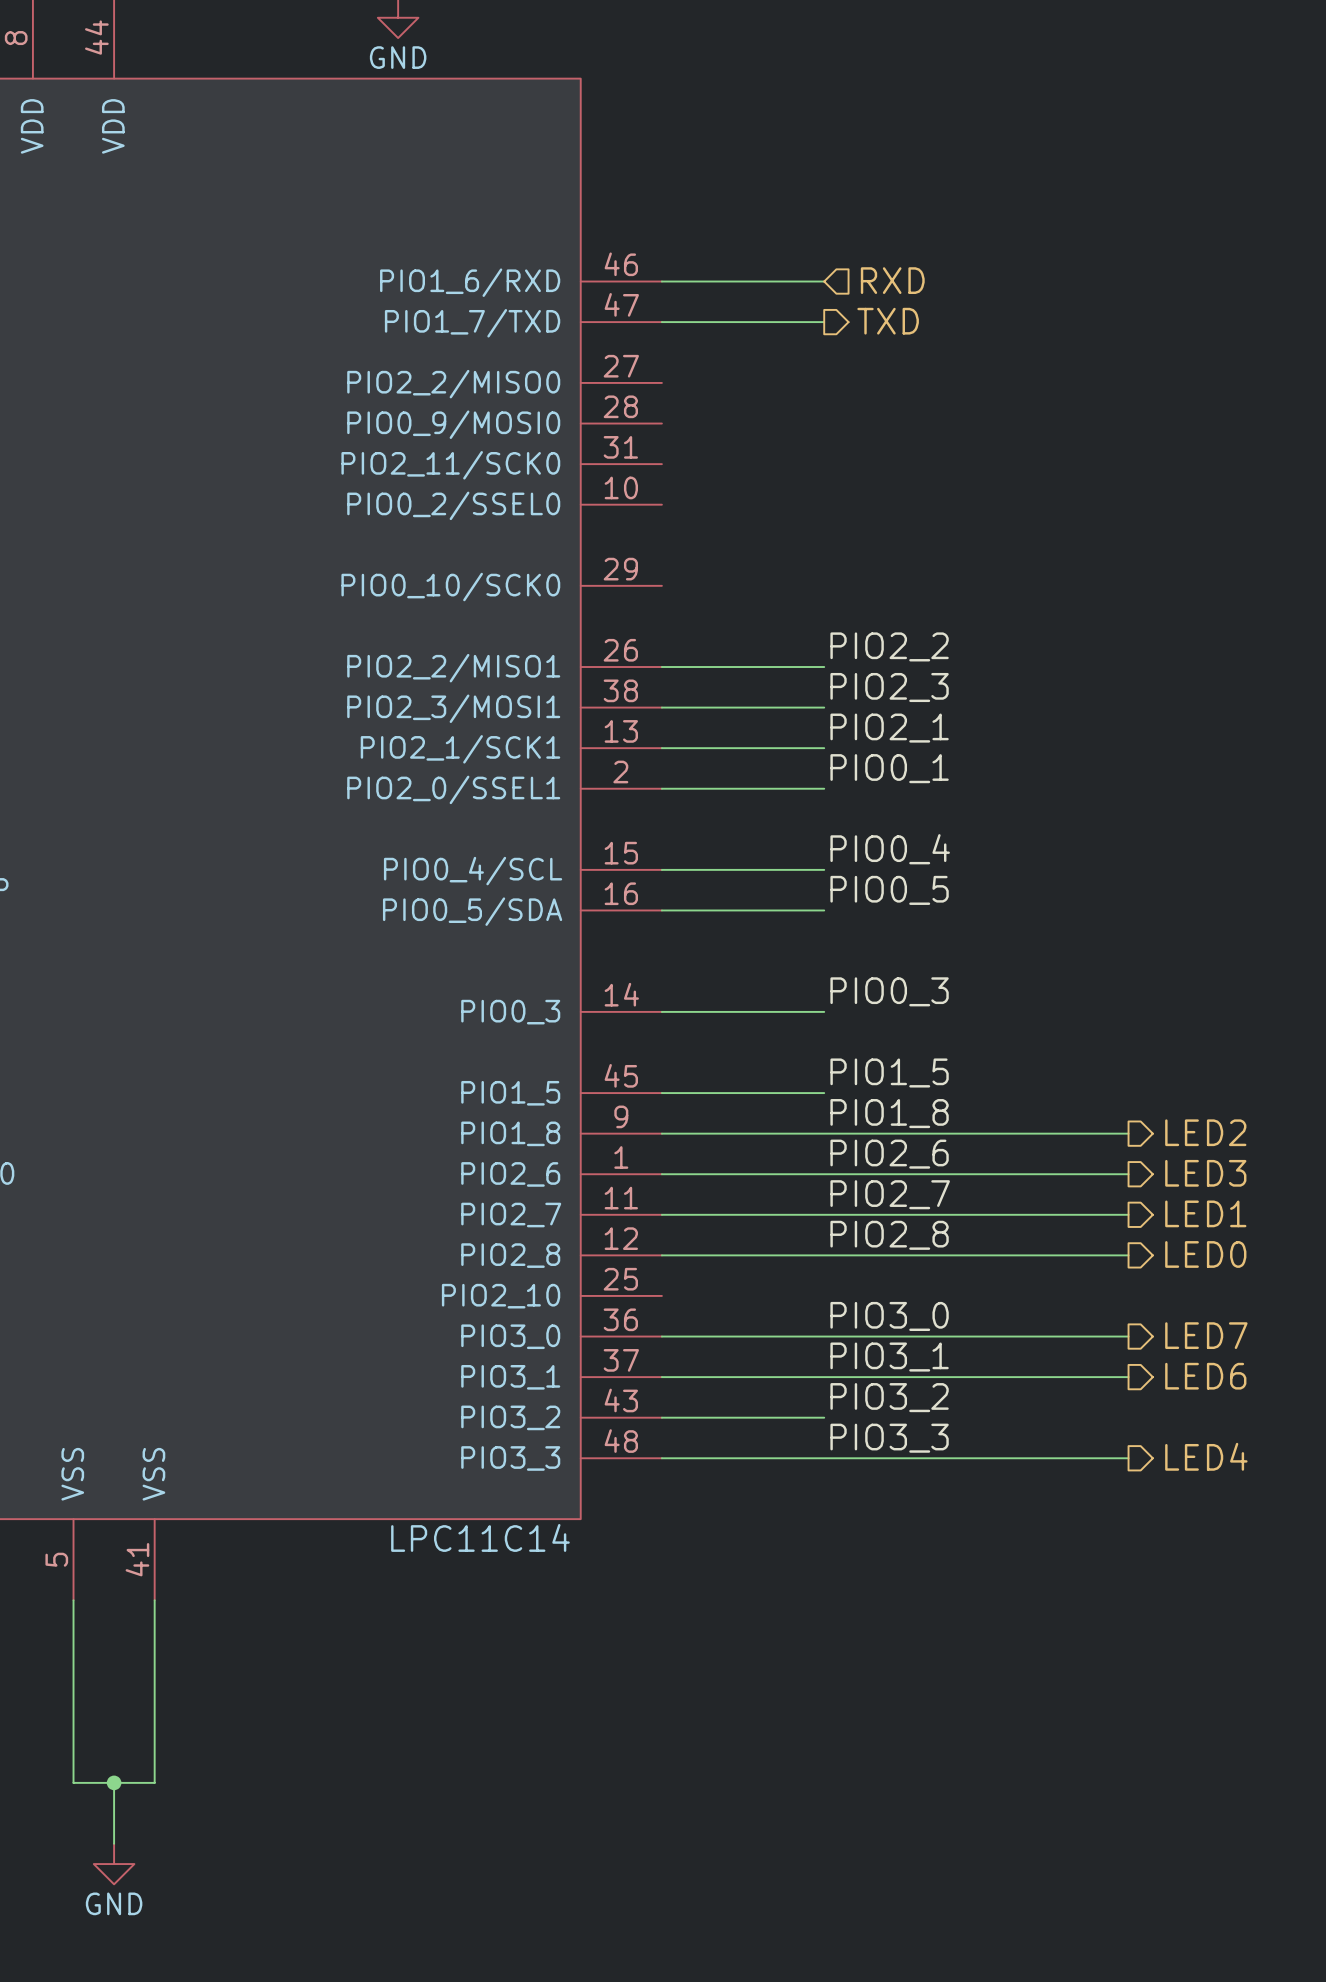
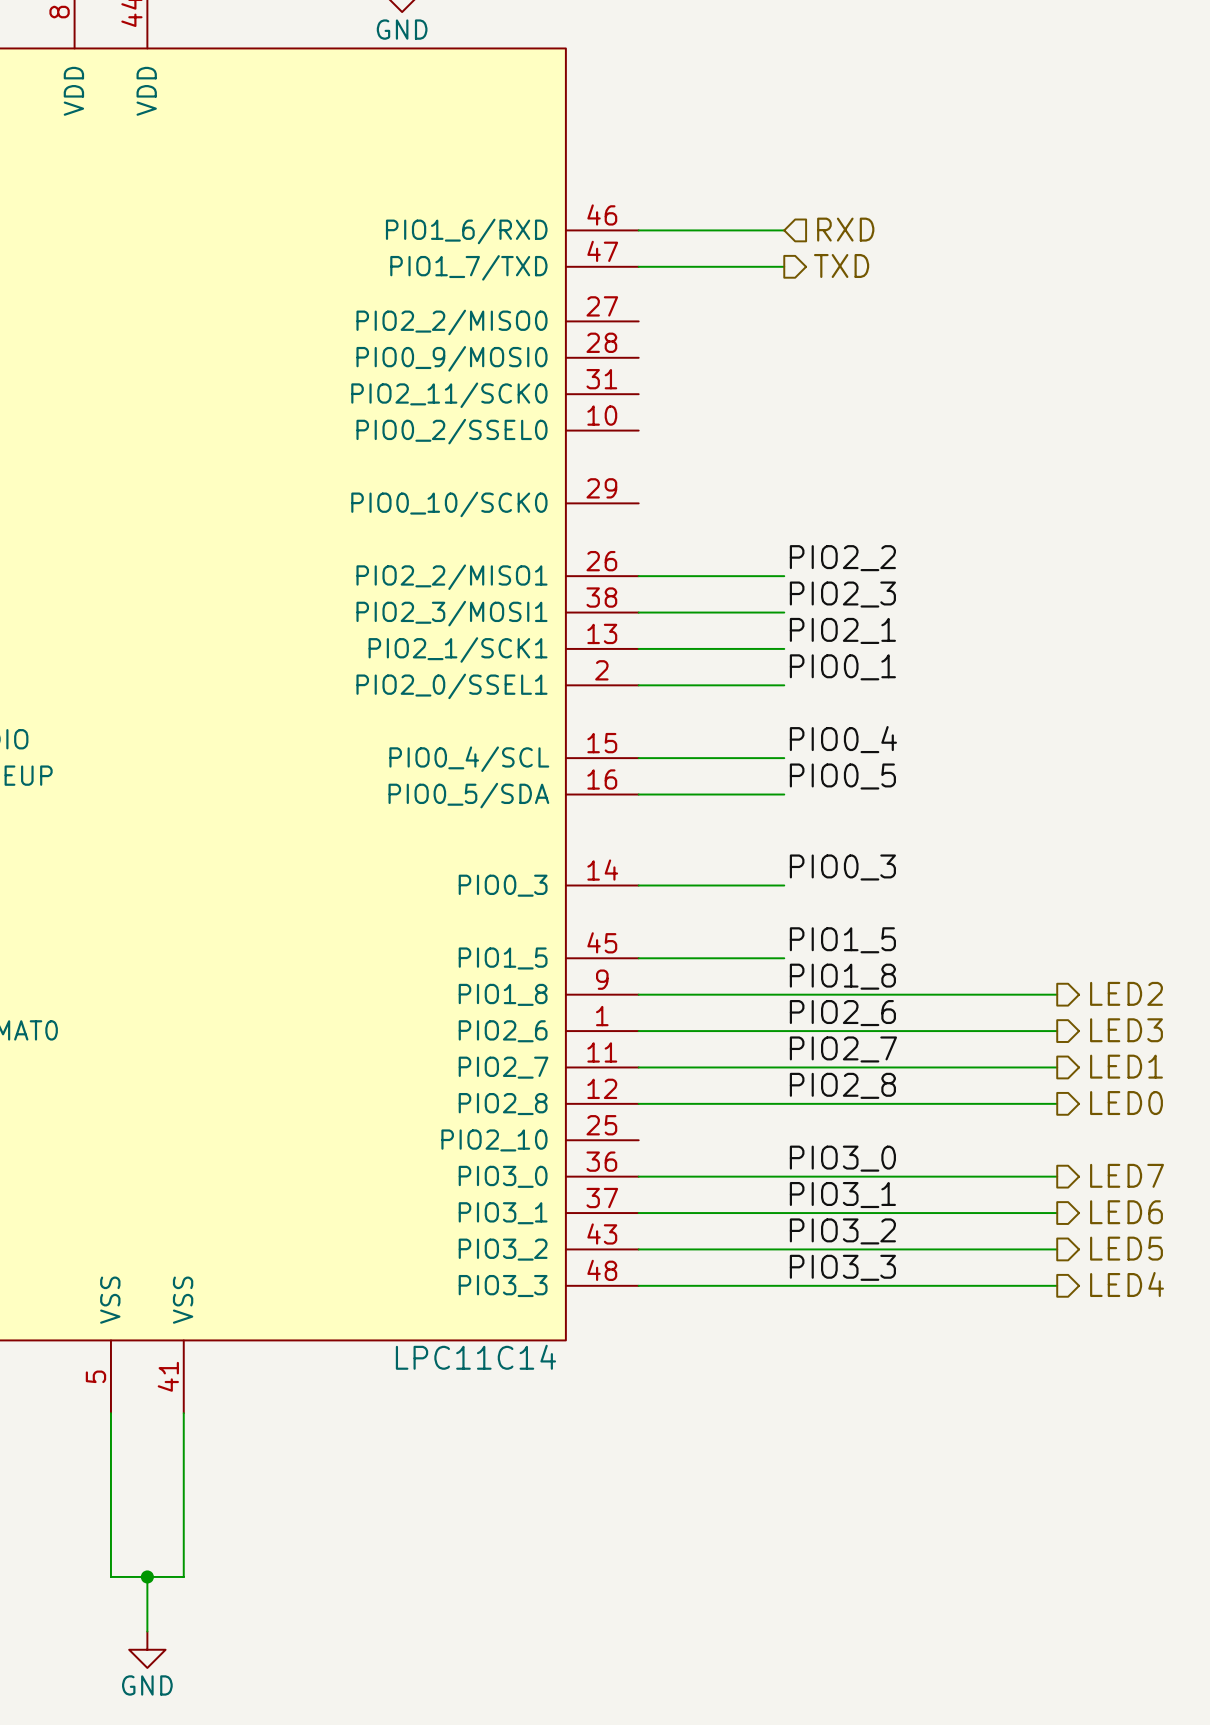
hierarchical label: none -> LED5 (1126, 1248)
wire: none -> (784, 1249) (1057, 1249)

